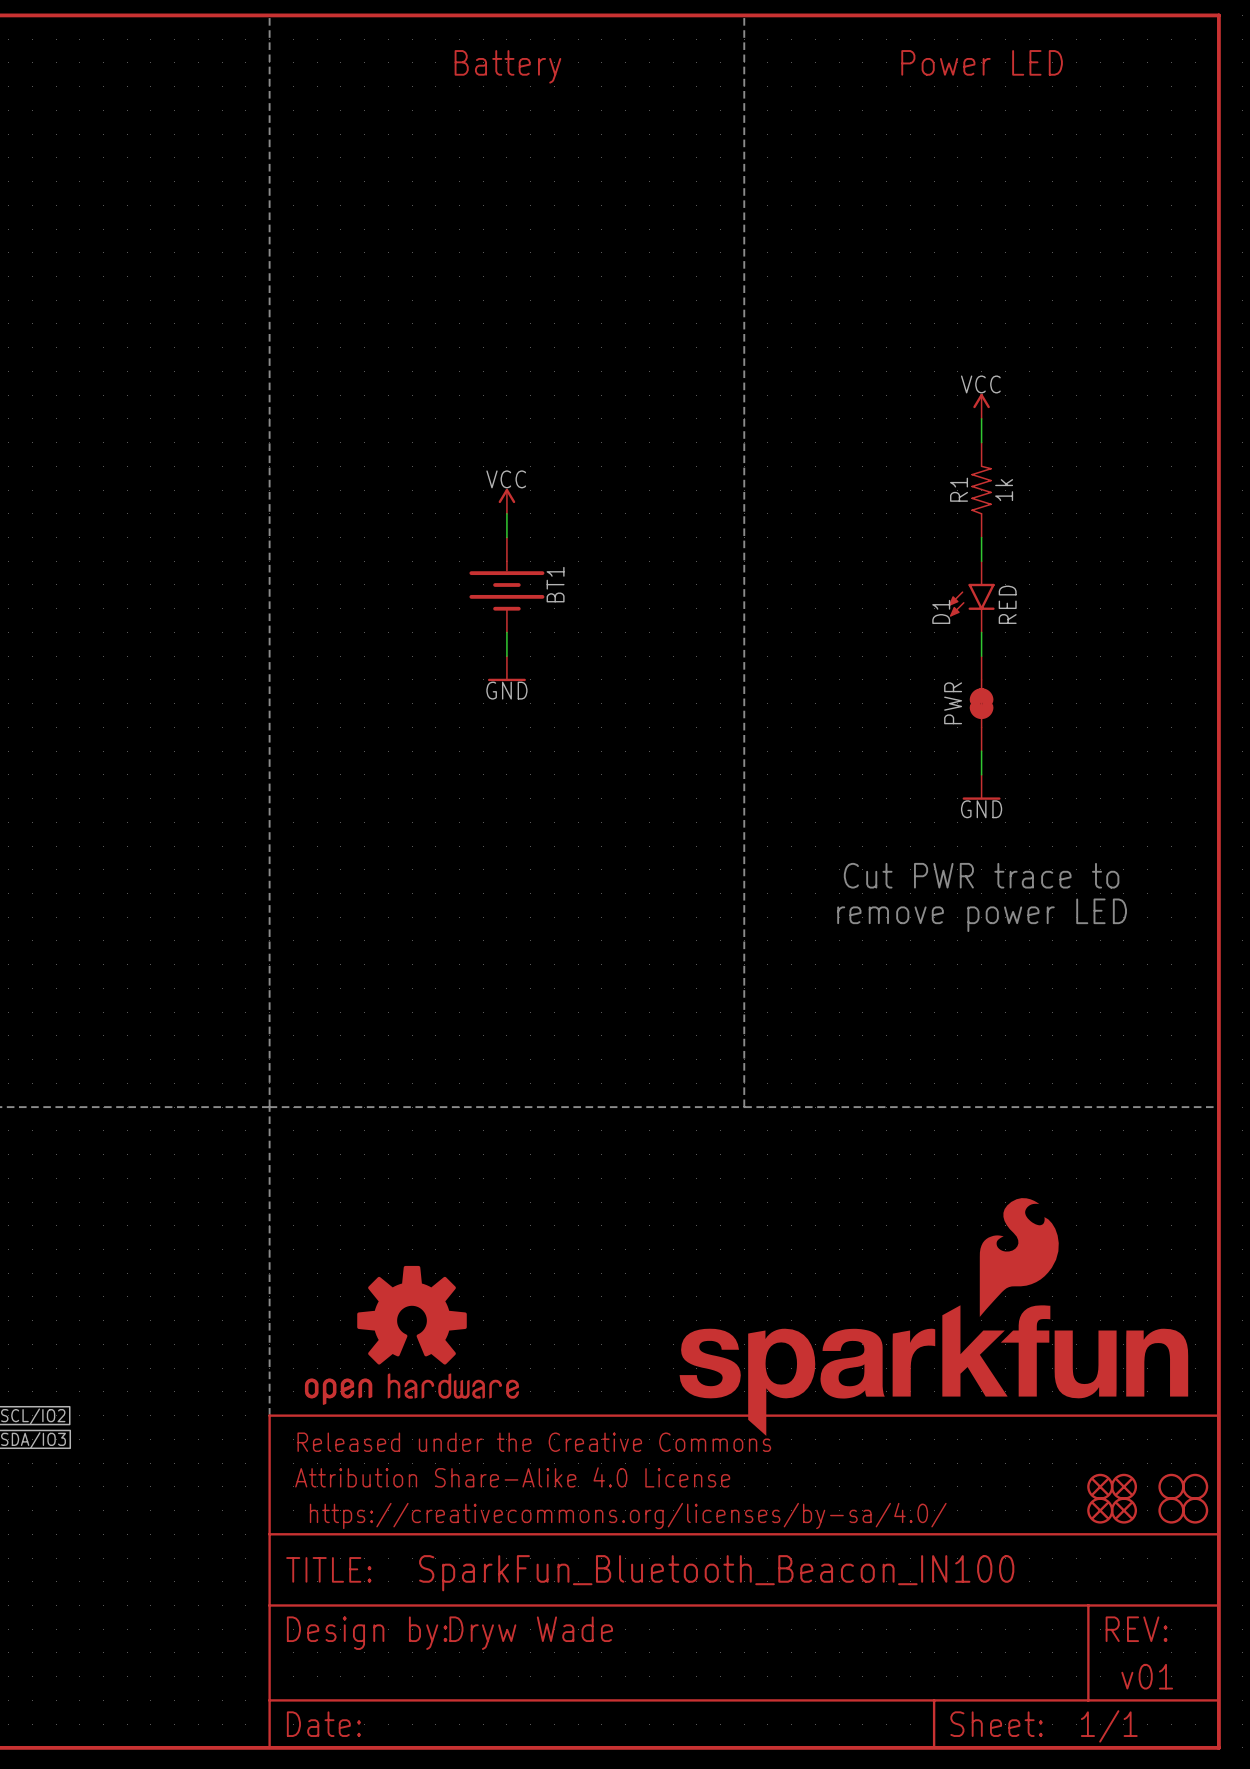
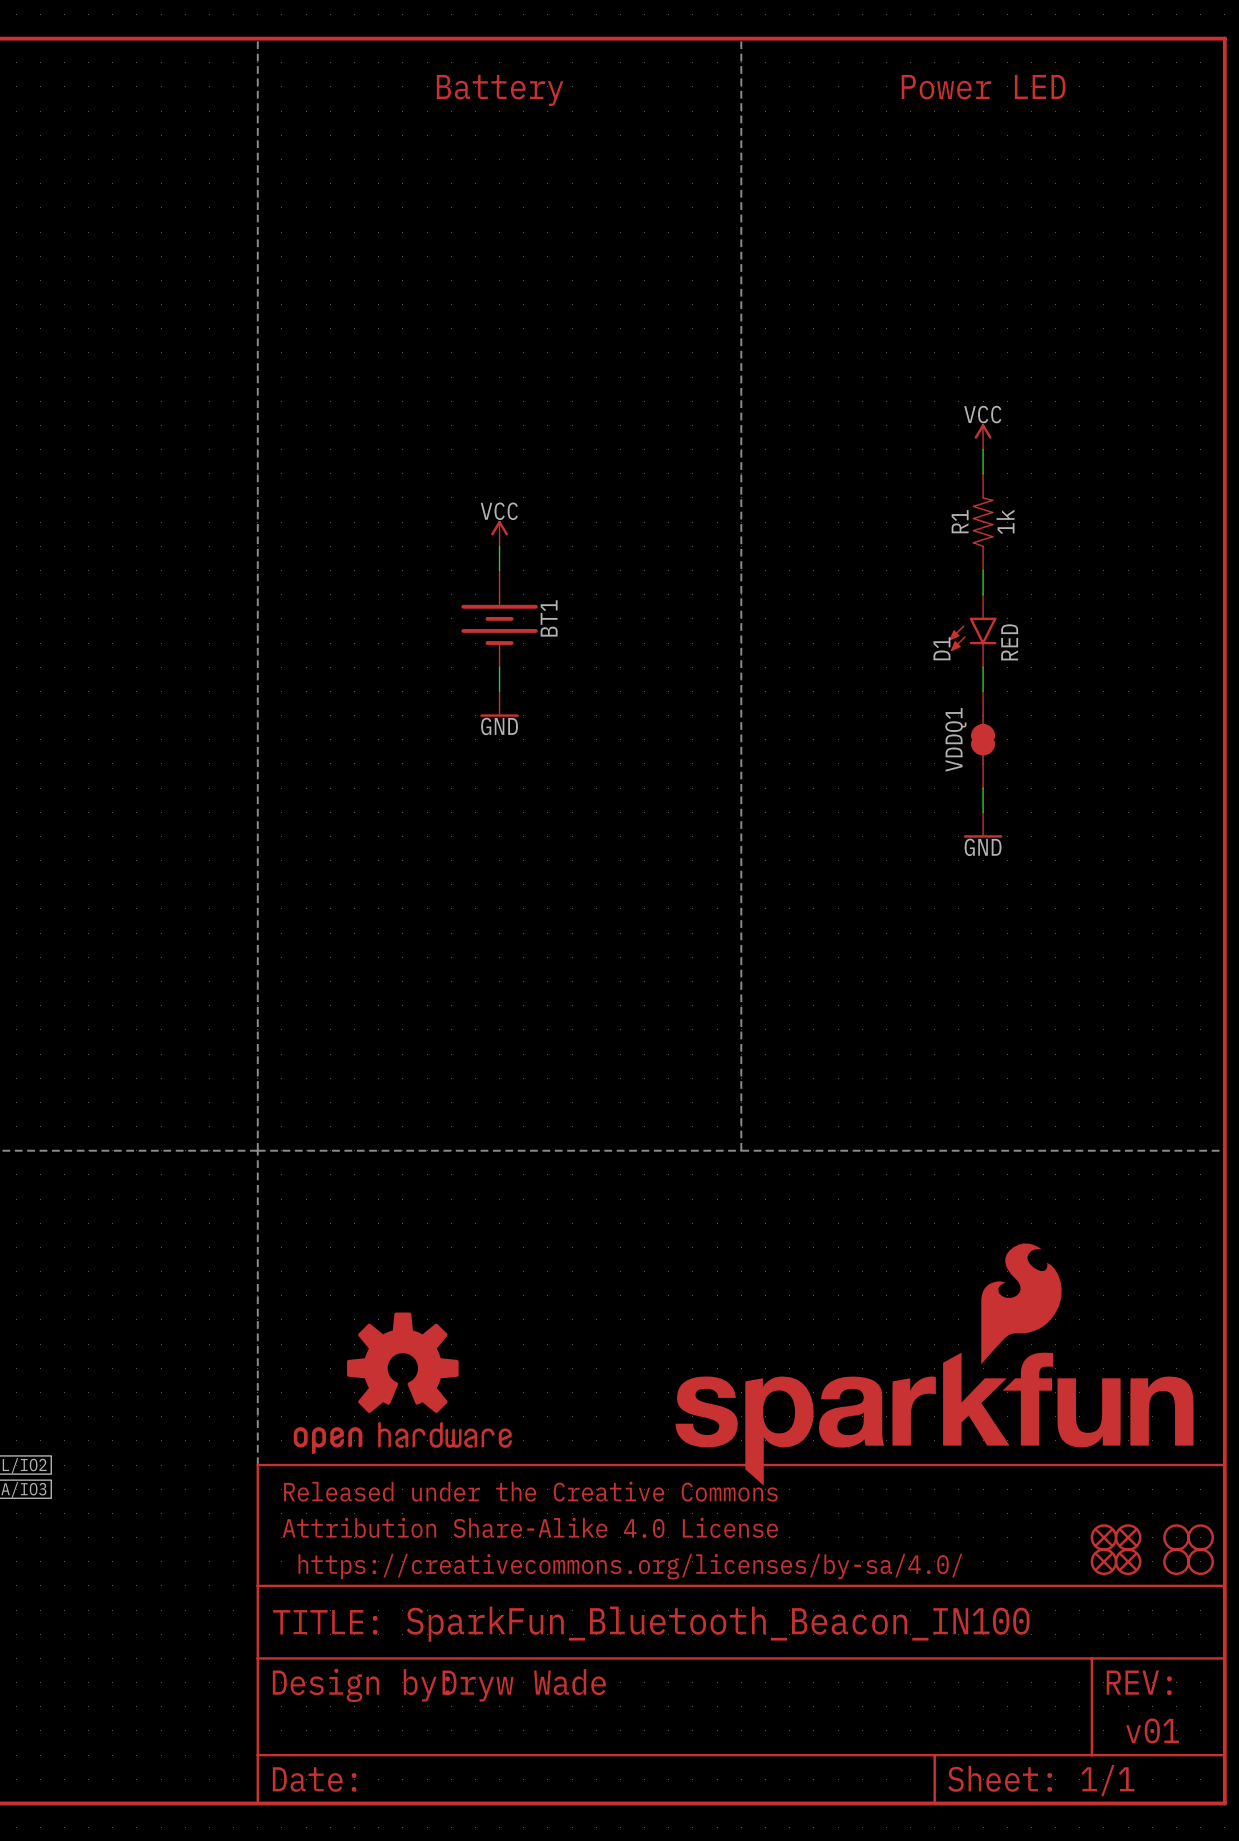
PWR name: PWR (953, 703) -> VDDQ1 (955, 739)
text: Cut PWR trace to (981, 875) -> none
text: remove power LED (982, 915) -> none

